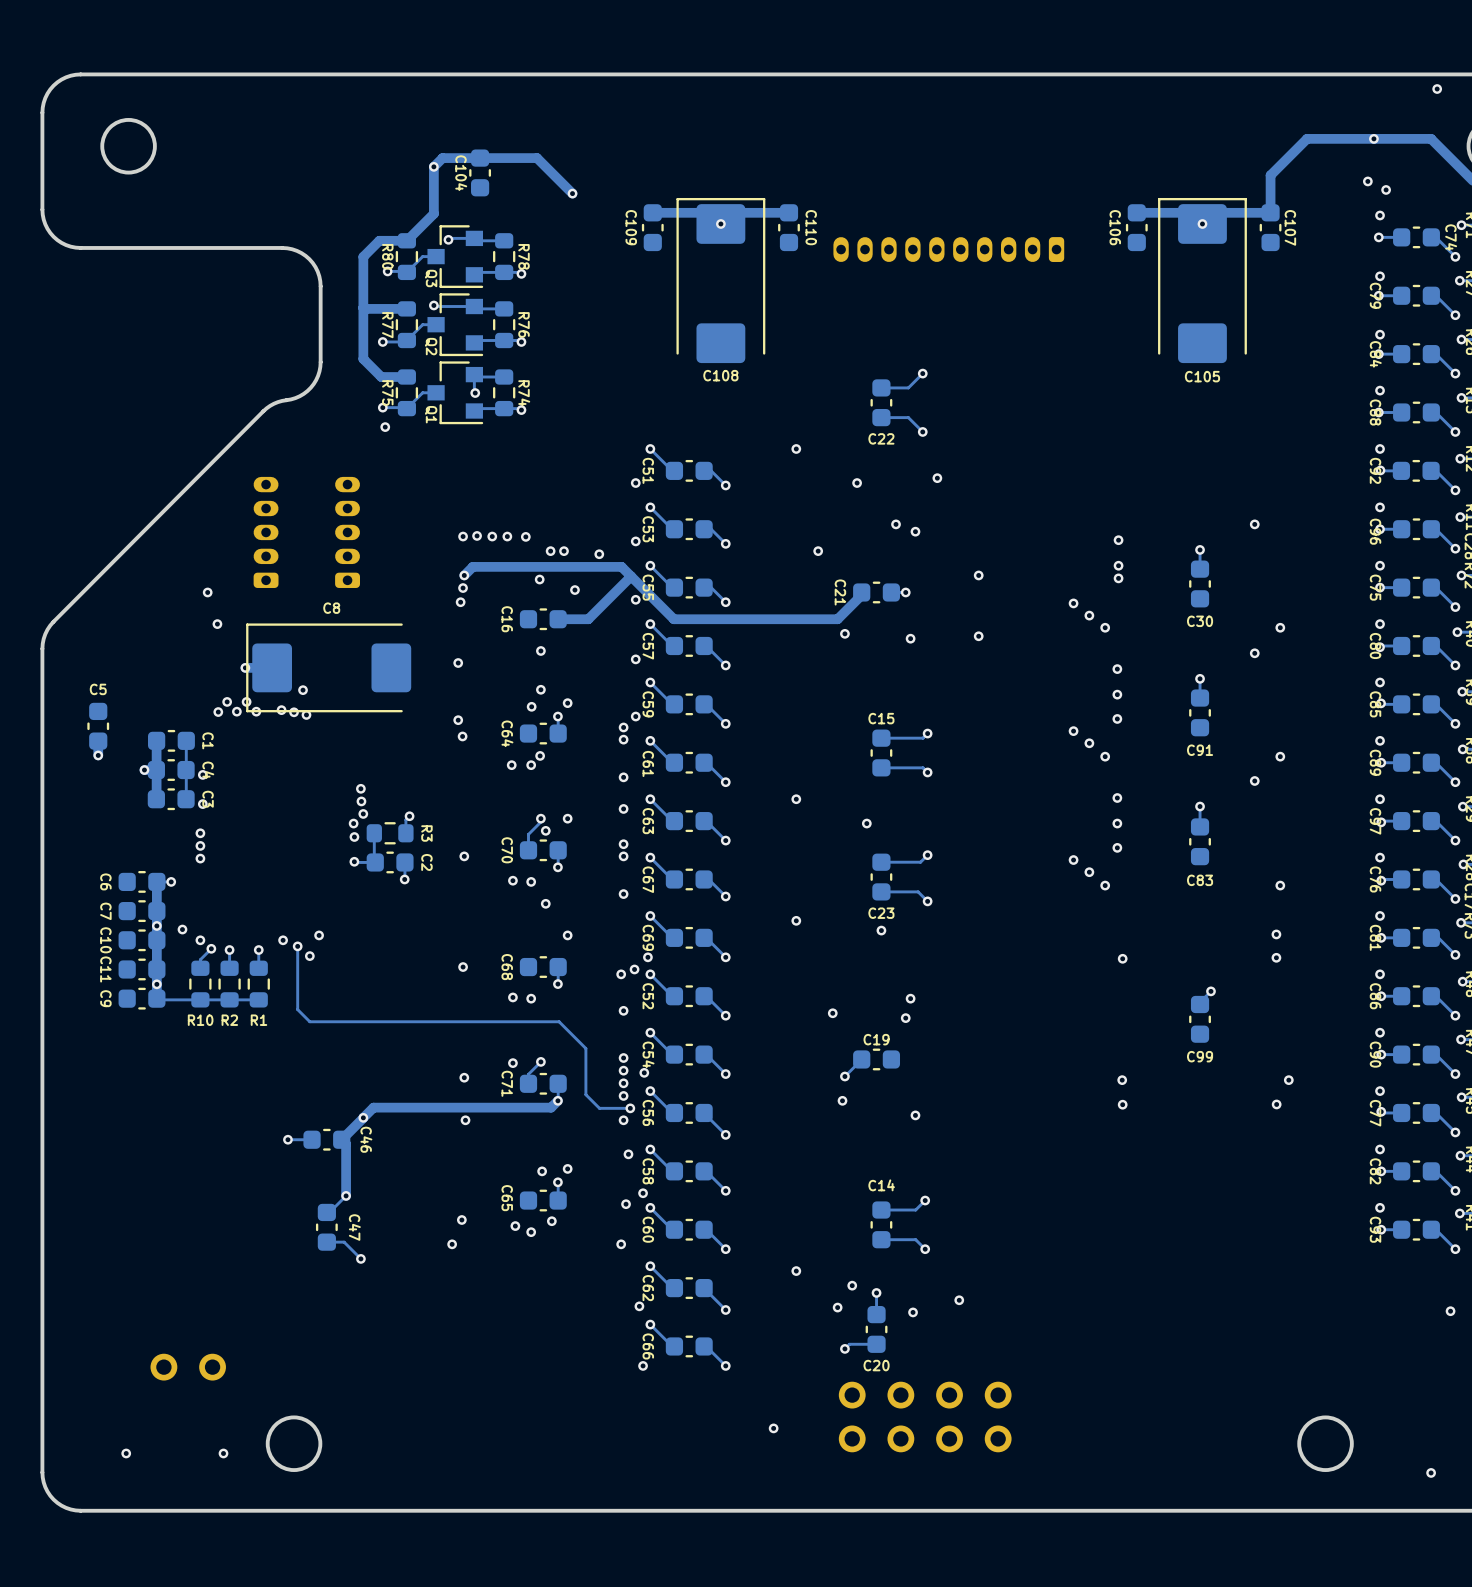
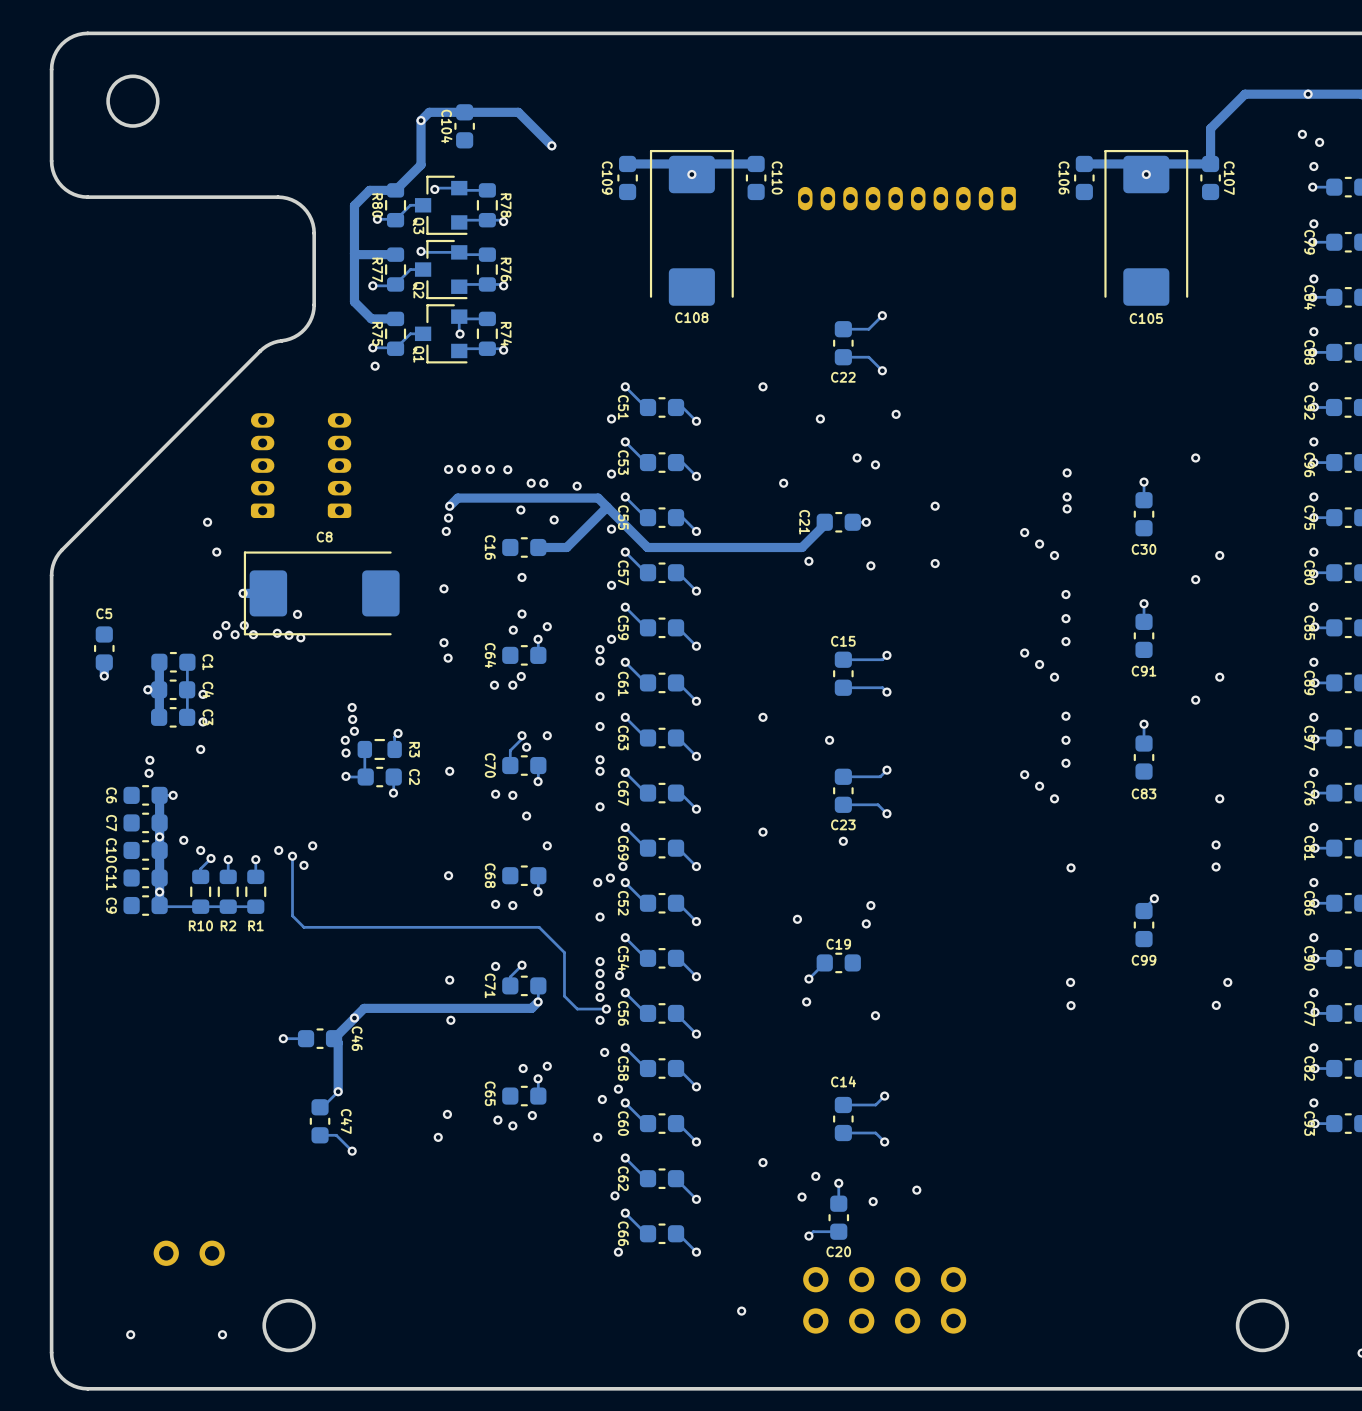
via: none -> (149, 760)
via: (200, 845) -> none
via: none -> (149, 773)
via: (200, 858) -> none

